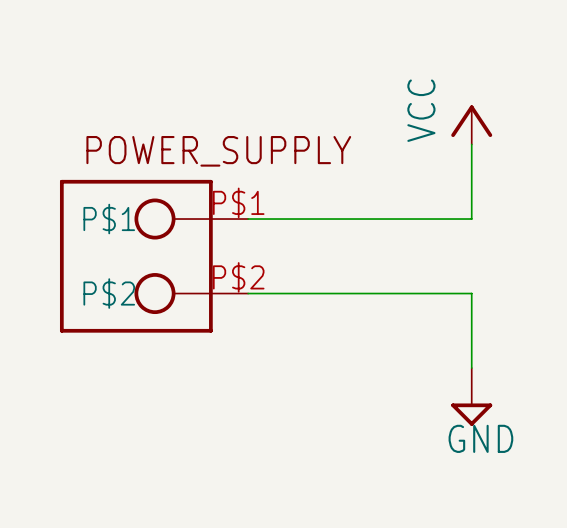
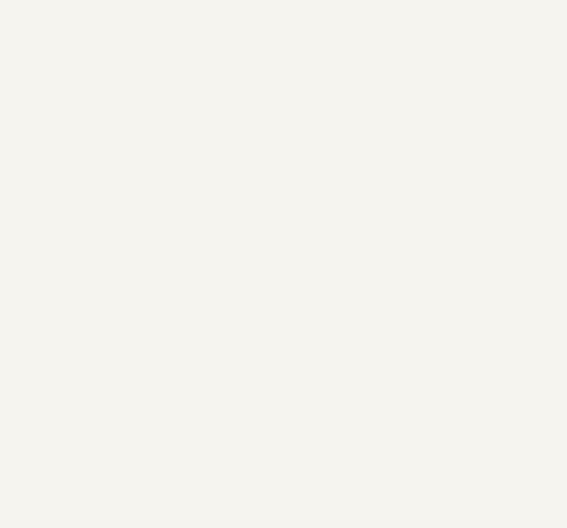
power symbol: VCC (471, 124) -> none
wire: (471, 144) (471, 219) (248, 219) -> none
POWER_SUPPLY: (154, 256) -> none
wire: (248, 293) (471, 293) (471, 368) -> none
power symbol: GND (471, 396) -> none

